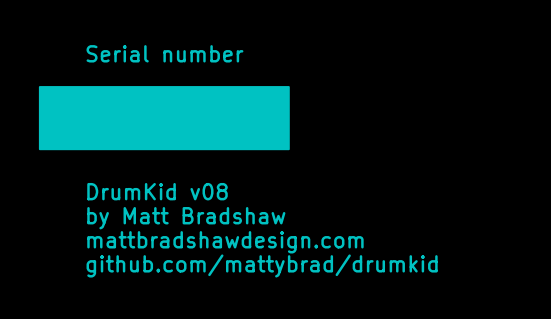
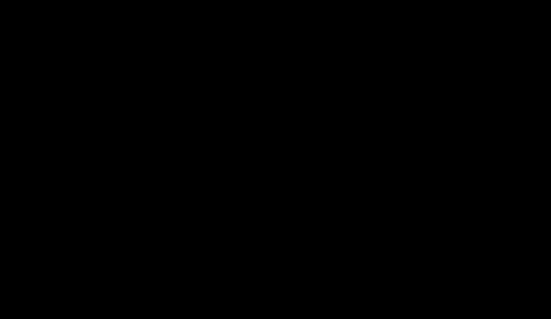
text: Serial number (164, 53) -> none
drawing: [38, 86, 290, 151] -> none
text: DrumKid v08 (157, 191) -> none
text: by Matt Bradshaw (186, 218) -> none
text: mattbradshawdesign.com (225, 242) -> none
text: github.com/mattybrad/drumkid (262, 265) -> none

